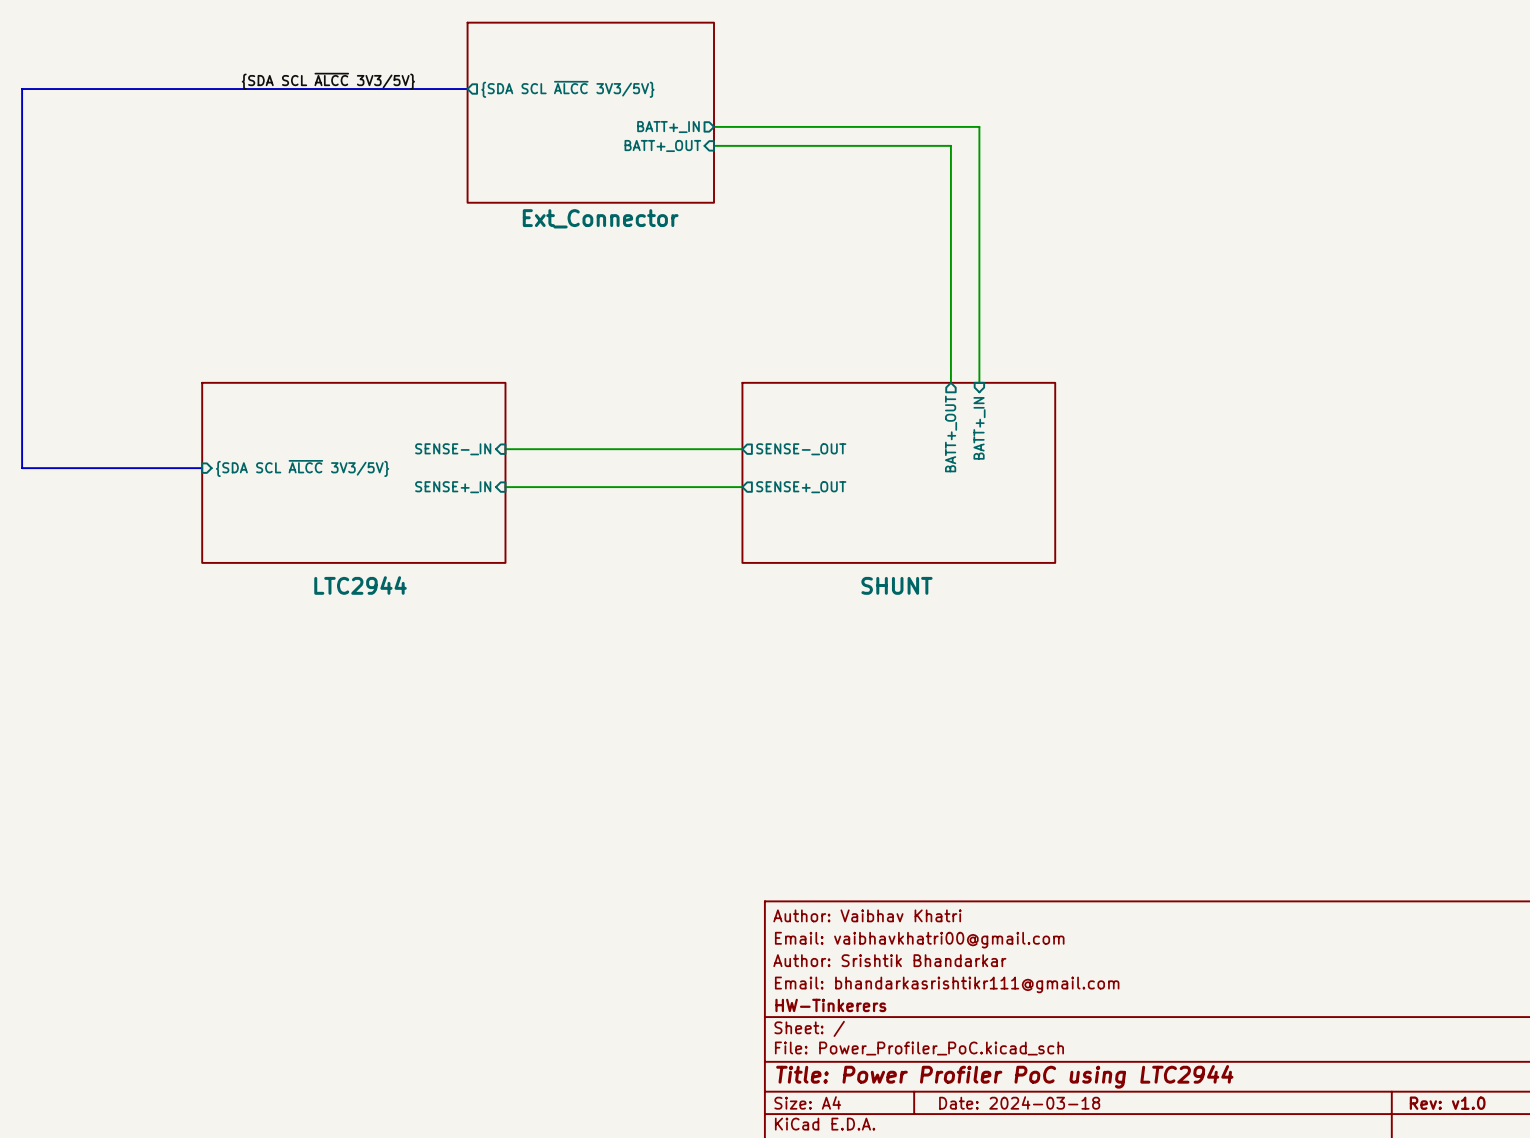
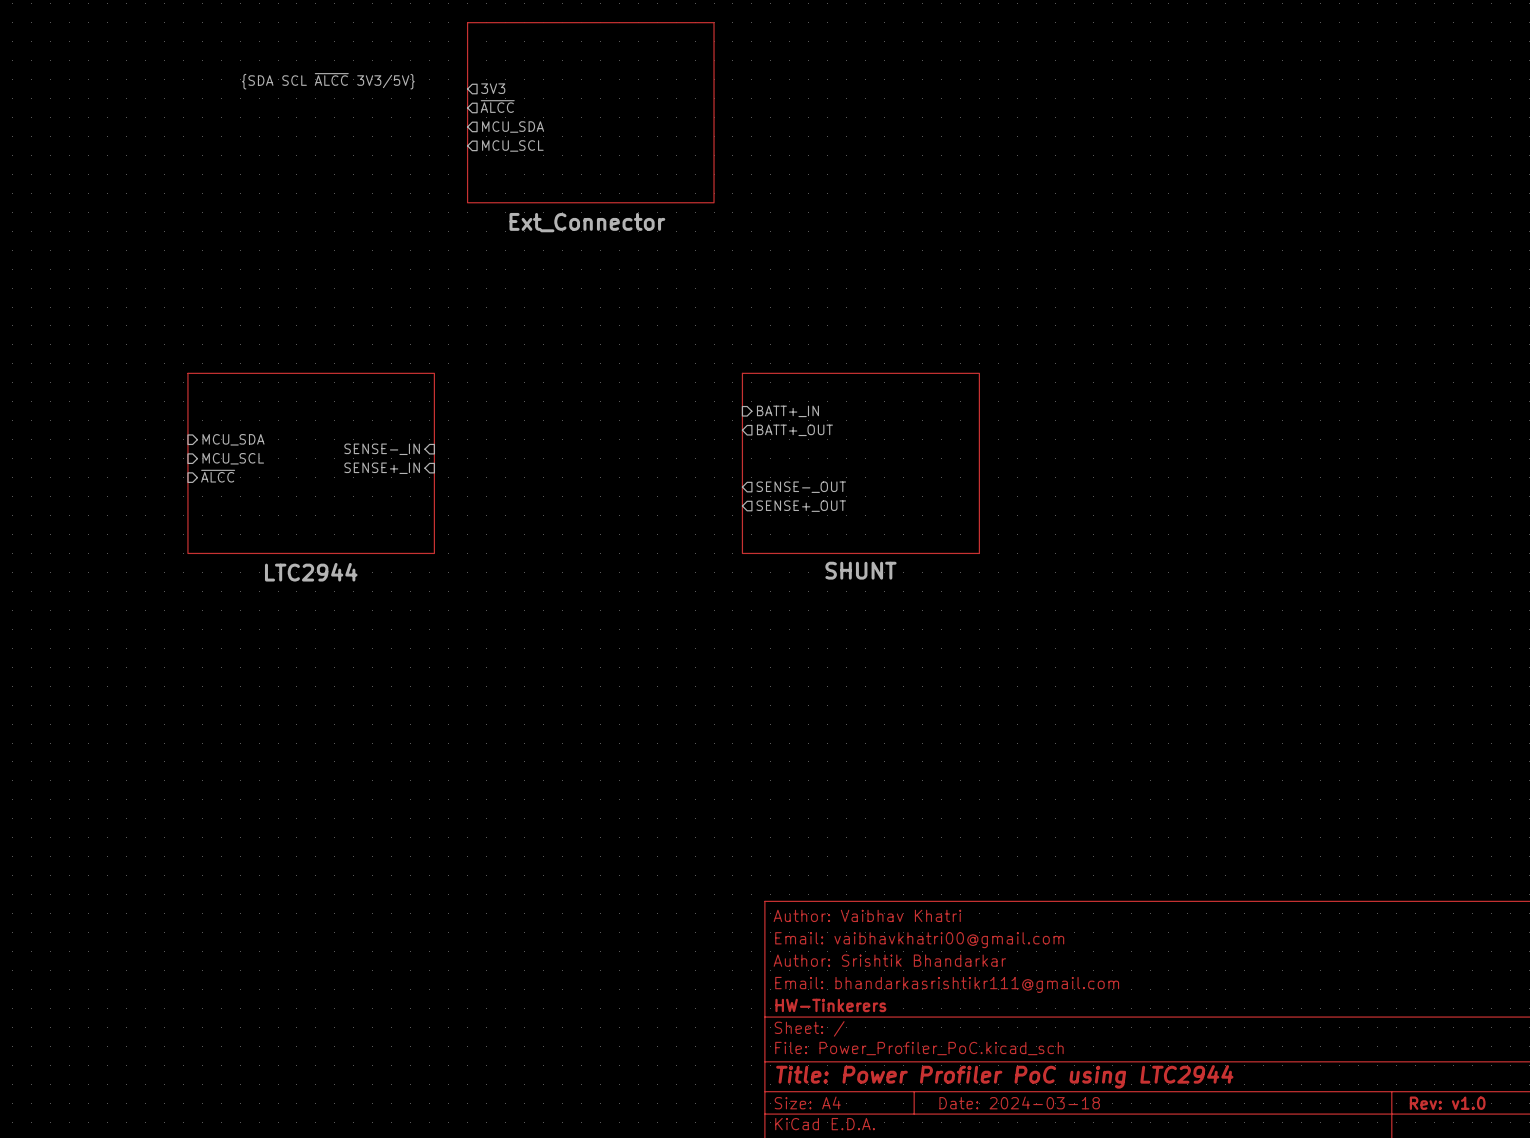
bus: (467, 89) (22, 89) (22, 468) (202, 468) -> none
sheet pin: {SDA SCL ~{ALCC} 3V3/5V} (567, 89) -> 3V3 (493, 88)
sheet pin: none -> ~{ALCC} (497, 106)
wire: (714, 126) (979, 126) (979, 382) -> none
sheet pin: none -> MCU_SDA (513, 127)
sheet pin: BATT+_IN (668, 127) -> none
sheet pin: none -> MCU_SCL (512, 145)
sheet pin: BATT+_OUT (662, 145) -> none
wire: (714, 145) (950, 145) (950, 382) -> none
sheet Ext_Connector name position: Ext_Connector (600, 218) -> Ext_Connector (587, 222)
sheet LTC2944 shape: [201, 382, 507, 564] -> [187, 372, 435, 555]
sheet pin: none -> BATT+_IN (787, 411)
sheet pin: BATT+_IN (979, 428) -> none
sheet pin: none -> BATT+_OUT (794, 430)
sheet pin: BATT+_OUT (951, 433) -> none
sheet pin: none -> MCU_SDA (233, 439)
sheet pin position: SENSE-_IN (453, 449) -> SENSE-_IN (382, 449)
wire: (505, 449) (742, 449) -> none
sheet pin: SENSE-_OUT (801, 449) -> none
sheet pin: none -> MCU_SCL (233, 458)
sheet SHUNT: none -> (860, 463)
sheet pin: {SDA SCL ~{ALCC} 3V3/5V} (302, 468) -> none
sheet SHUNT: (898, 472) -> none
sheet pin: none -> ~{ALCC} (218, 476)
sheet pin position: SENSE+_IN (453, 487) -> SENSE+_IN (382, 468)
wire: (505, 487) (742, 487) -> none
sheet pin: SENSE+_OUT (801, 487) -> SENSE-_OUT (801, 487)
sheet pin: none -> SENSE+_OUT (801, 506)

